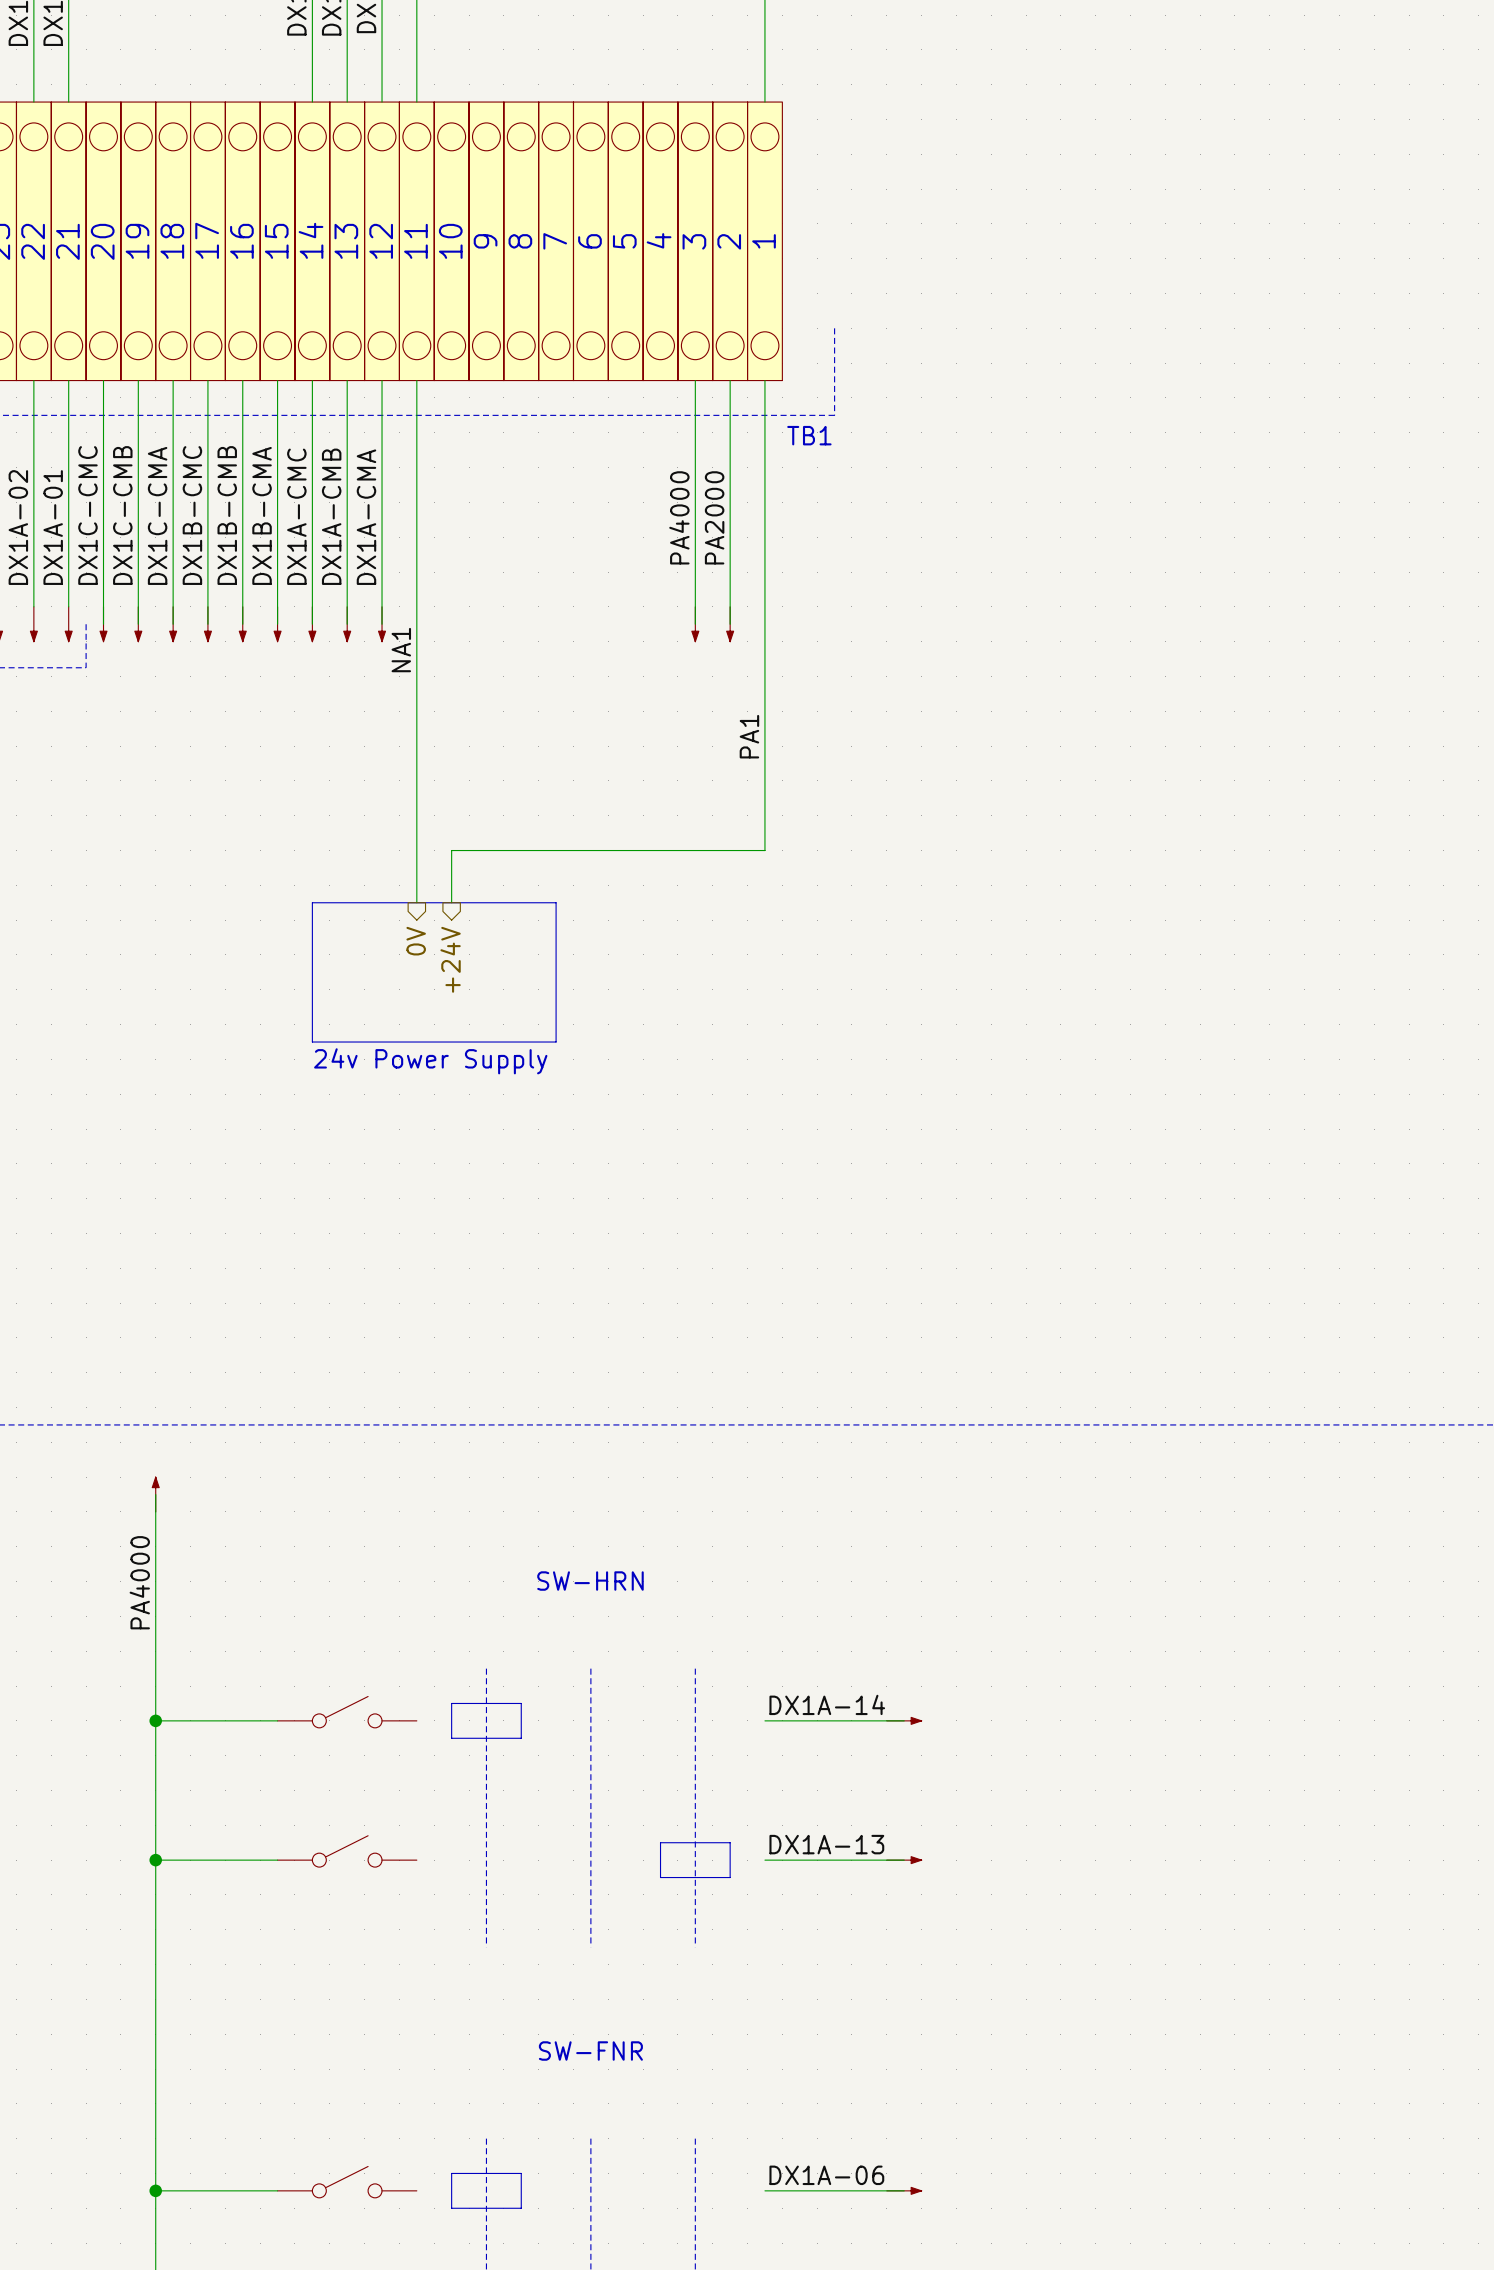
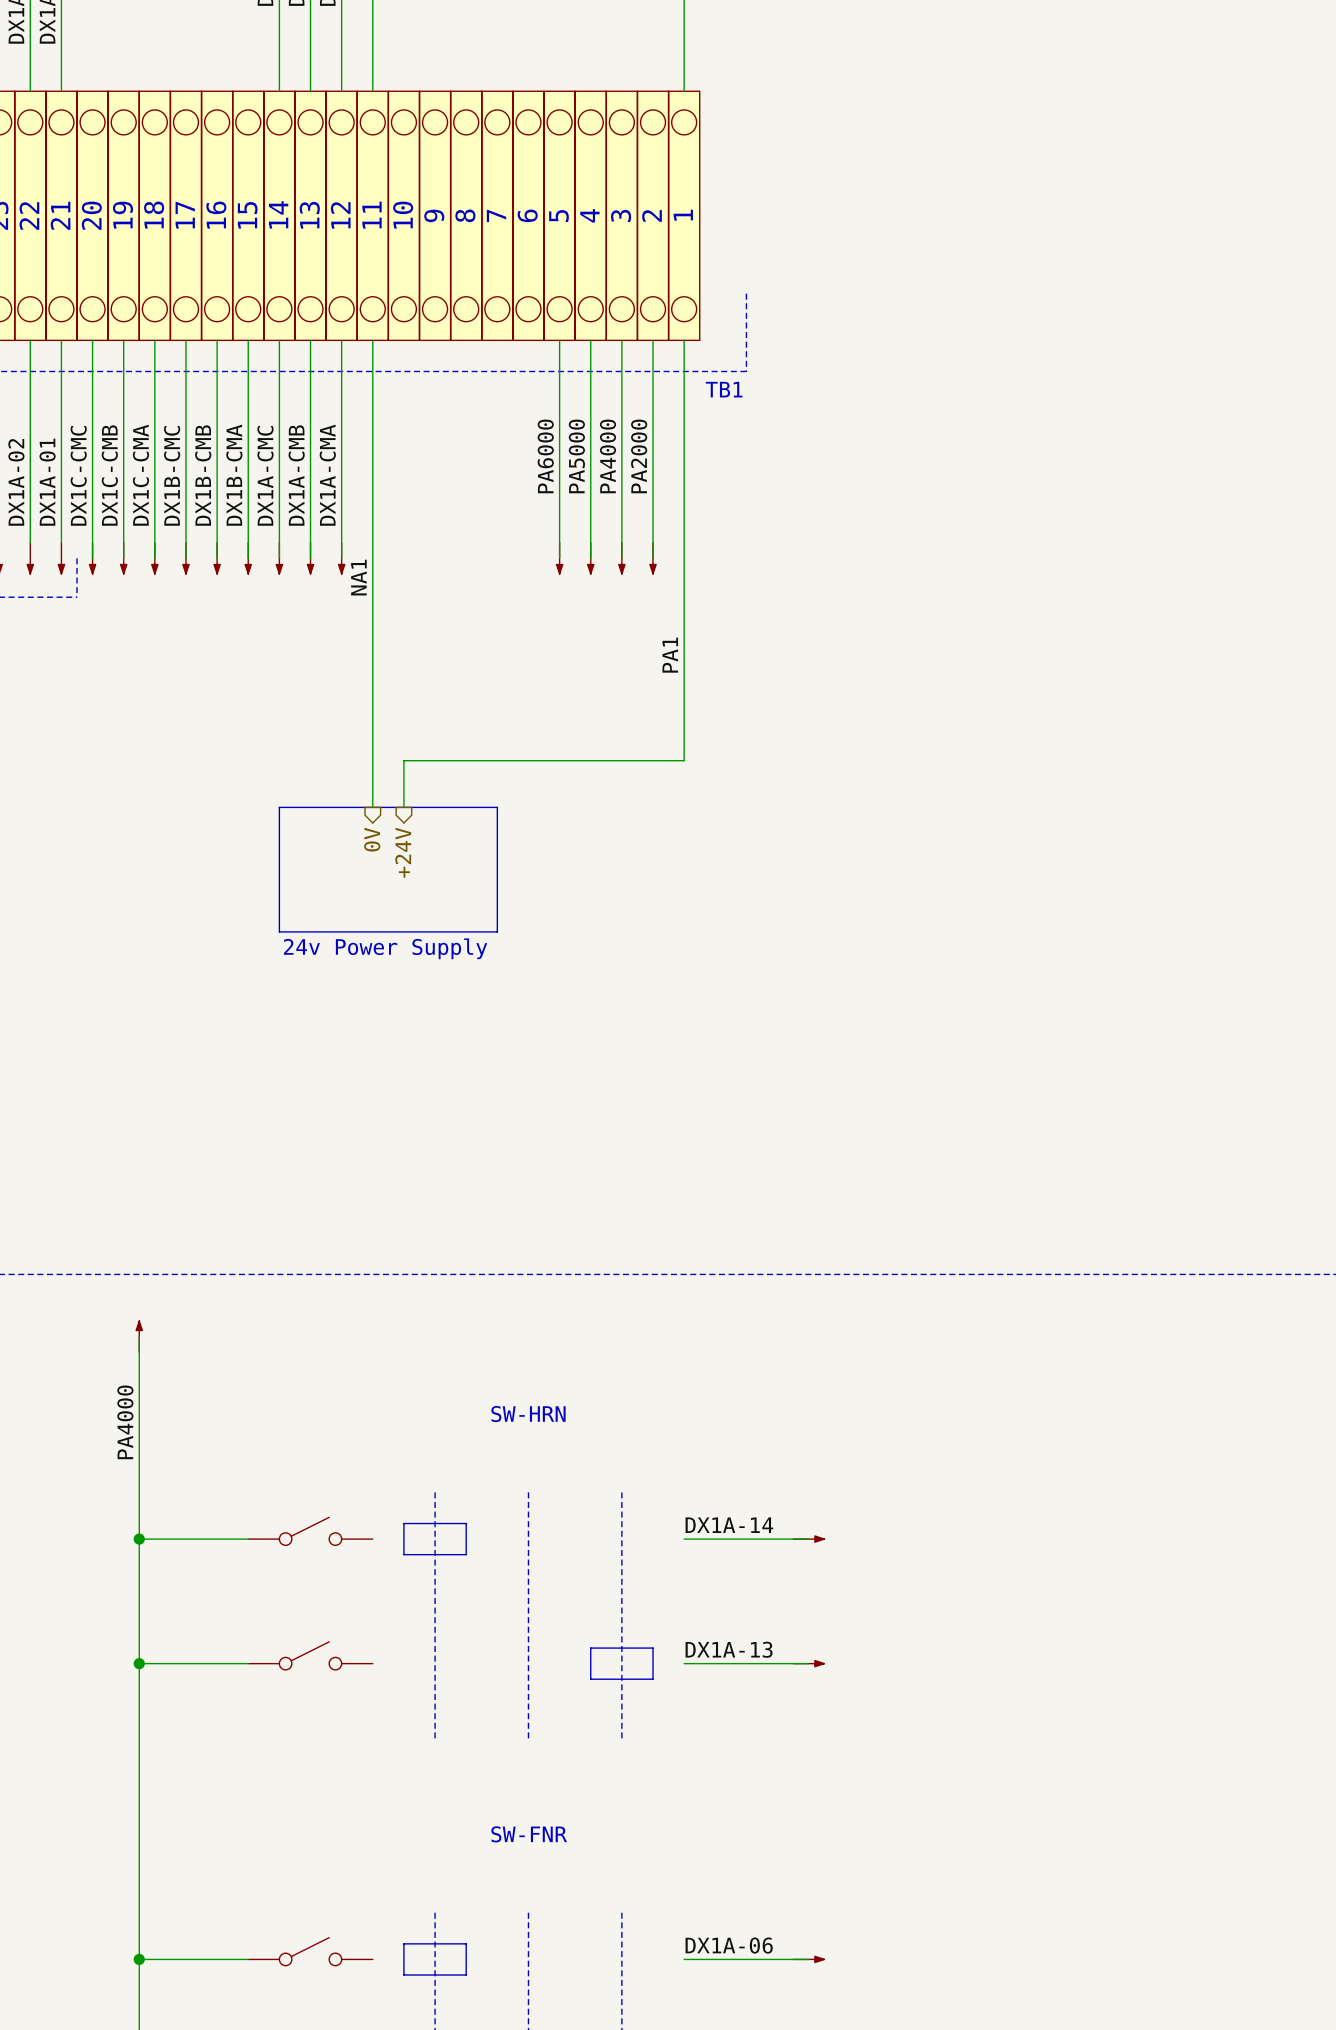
wire: none -> (559, 340) (559, 558)
wire: none -> (590, 340) (590, 558)
label: none -> PA6000 (545, 456)
label: none -> PA5000 (576, 456)
power symbol: none -> (559, 558)
power symbol: none -> (590, 558)

